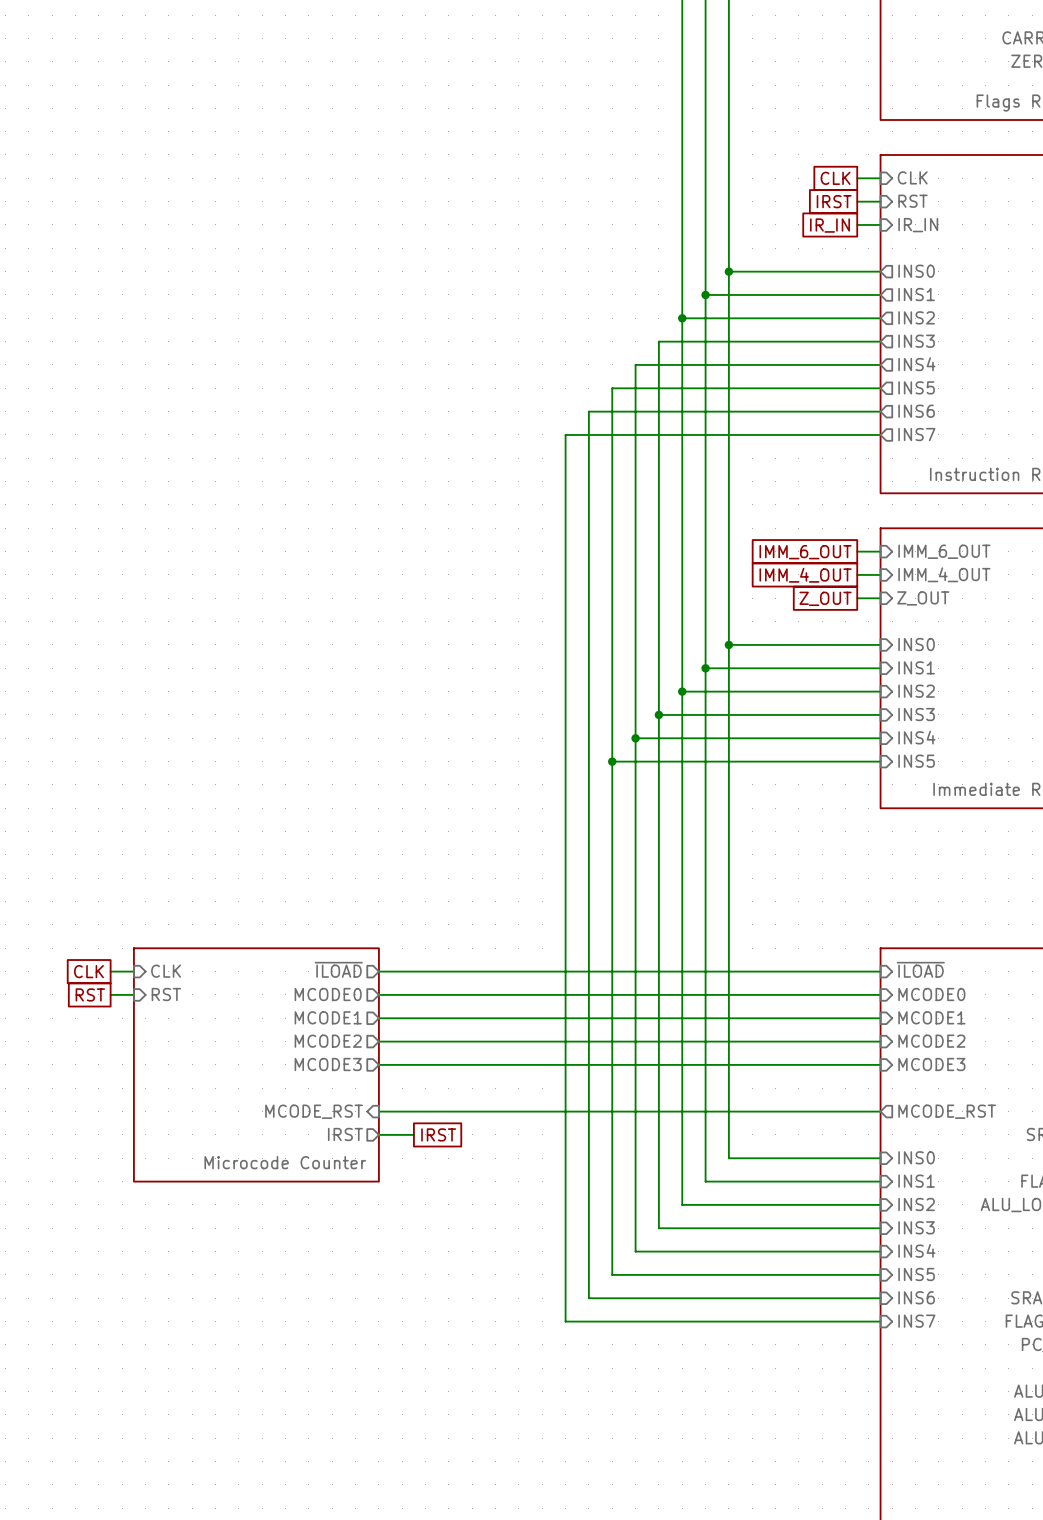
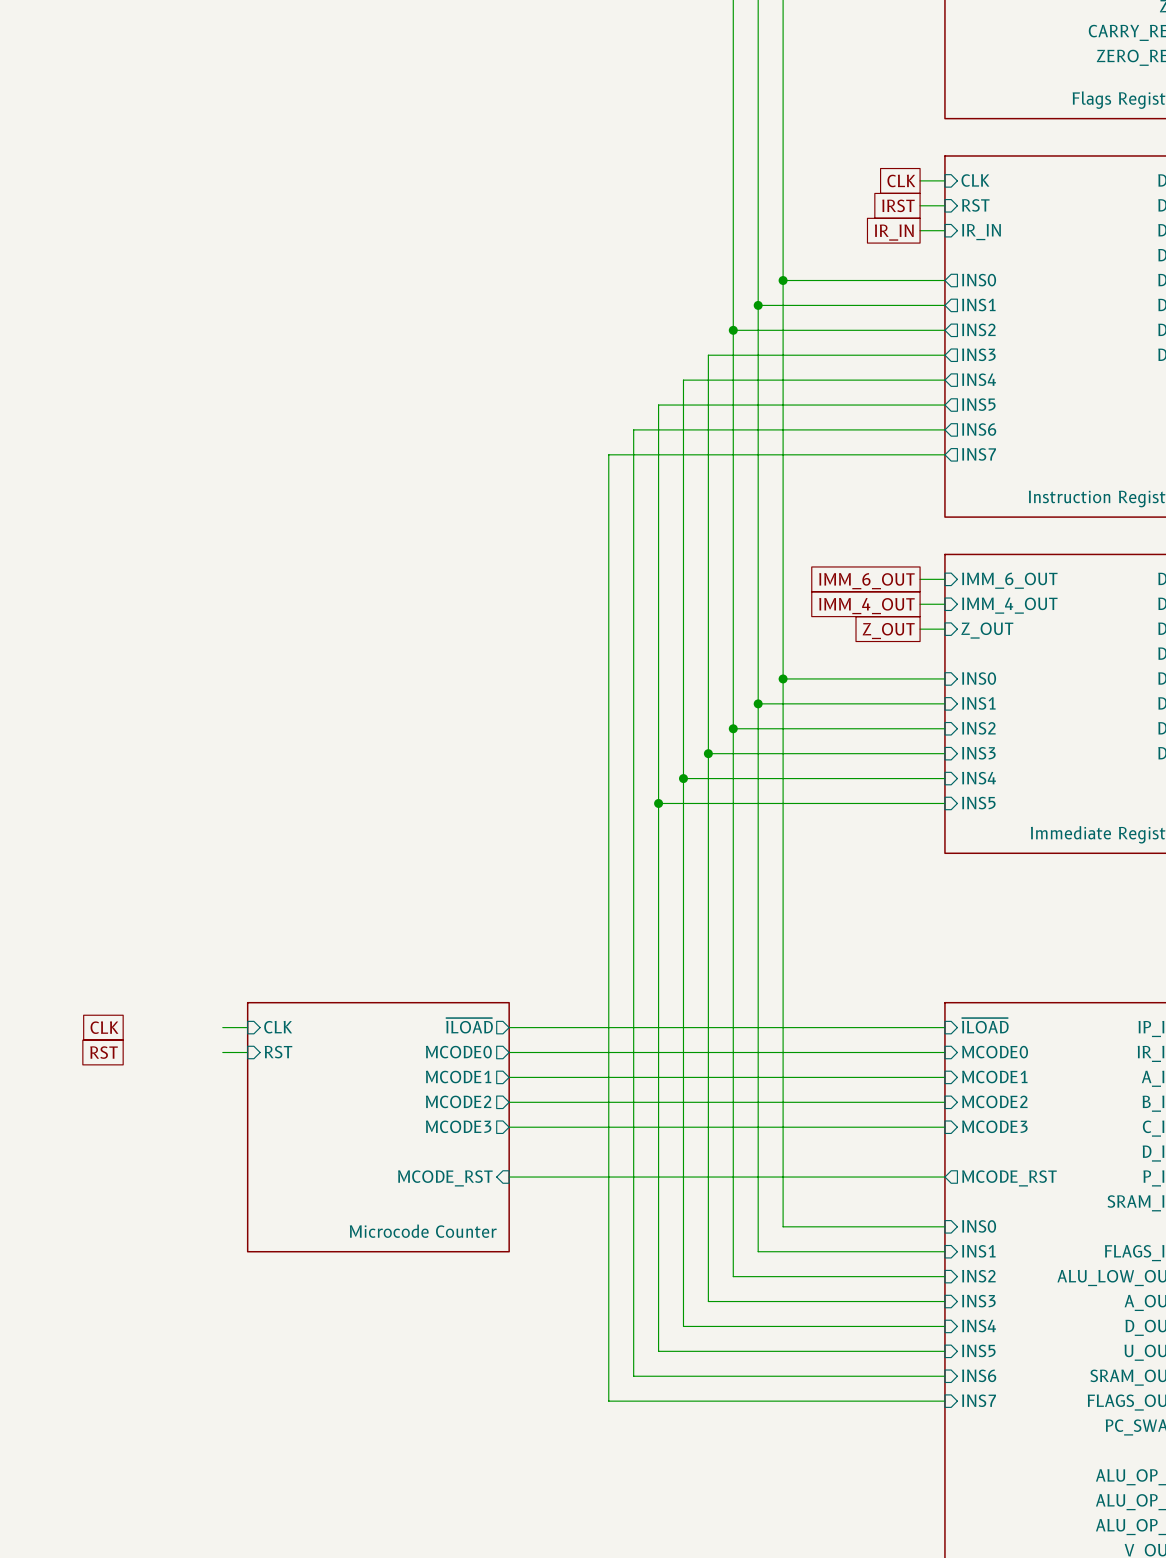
sheet pin position: ~{ILOAD} (338, 969) -> ~{ILOAD} (469, 1025)
wire: (110, 971) (133, 971) -> (222, 1027) (247, 1027)
sheet pin position: CLK (166, 971) -> CLK (278, 1027)
wire: (378, 971) (472, 971) -> none
wire: (110, 994) (133, 994) -> (222, 1052) (247, 1052)
sheet pin position: RST (166, 994) -> RST (278, 1052)
sheet pin position: MCODE0 (328, 994) -> MCODE0 (458, 1052)
wire: (378, 994) (472, 994) -> none
sheet pin position: MCODE1 (328, 1017) -> MCODE1 (458, 1077)
wire: (378, 1018) (472, 1018) -> none
sheet pin position: MCODE2 (328, 1041) -> MCODE2 (458, 1101)
wire: (378, 1041) (472, 1041) -> none
sheet Microcode Counter position: (256, 1064) -> (378, 1127)
sheet pin position: MCODE3 (328, 1064) -> MCODE3 (458, 1126)
wire: (378, 1064) (472, 1064) -> none
sheet pin position: MCODE_RST (314, 1111) -> MCODE_RST (445, 1178)
wire: (378, 1111) (472, 1111) -> none
sheet pin: IRST (345, 1134) -> none
wire: (378, 1134) (413, 1134) -> none
global label: IRST (438, 1134) -> none

